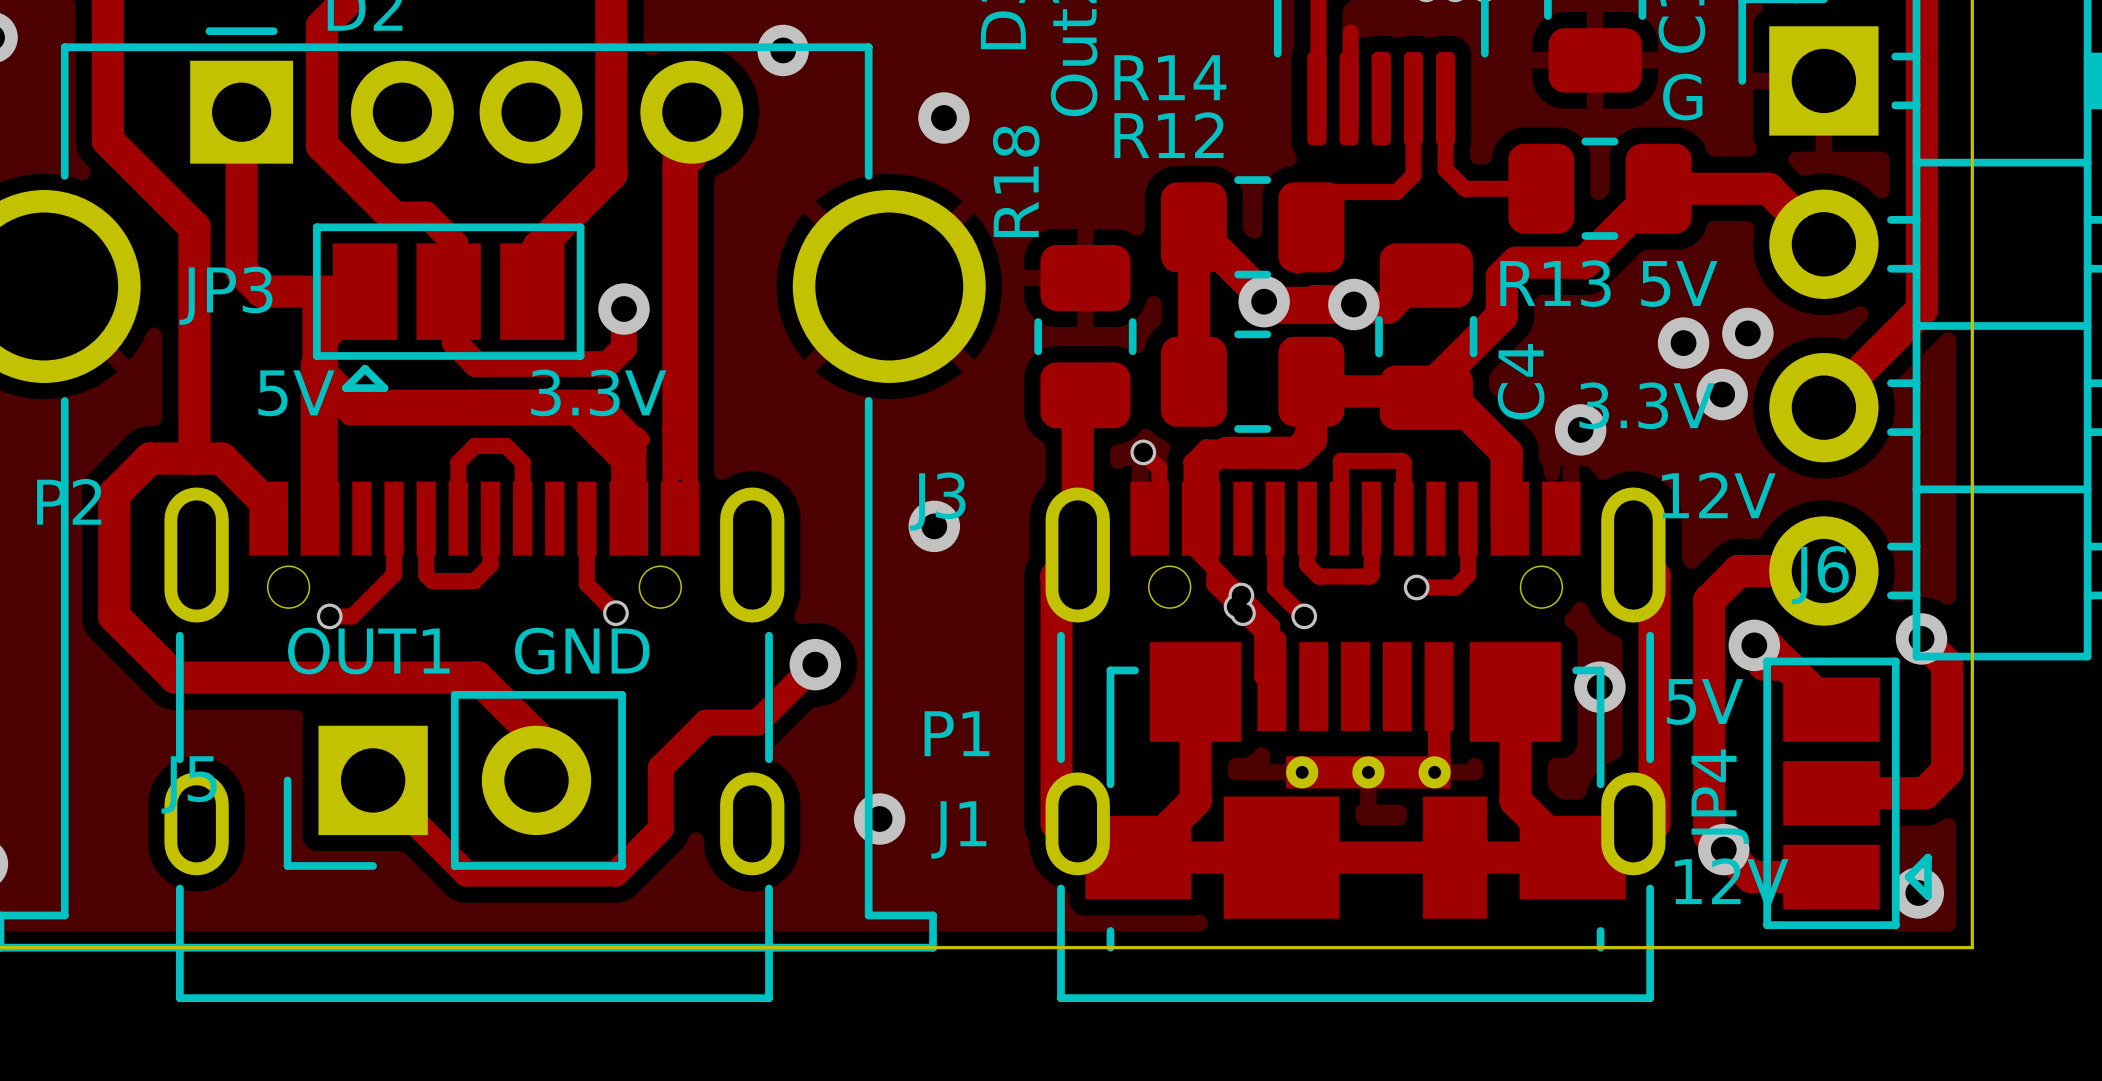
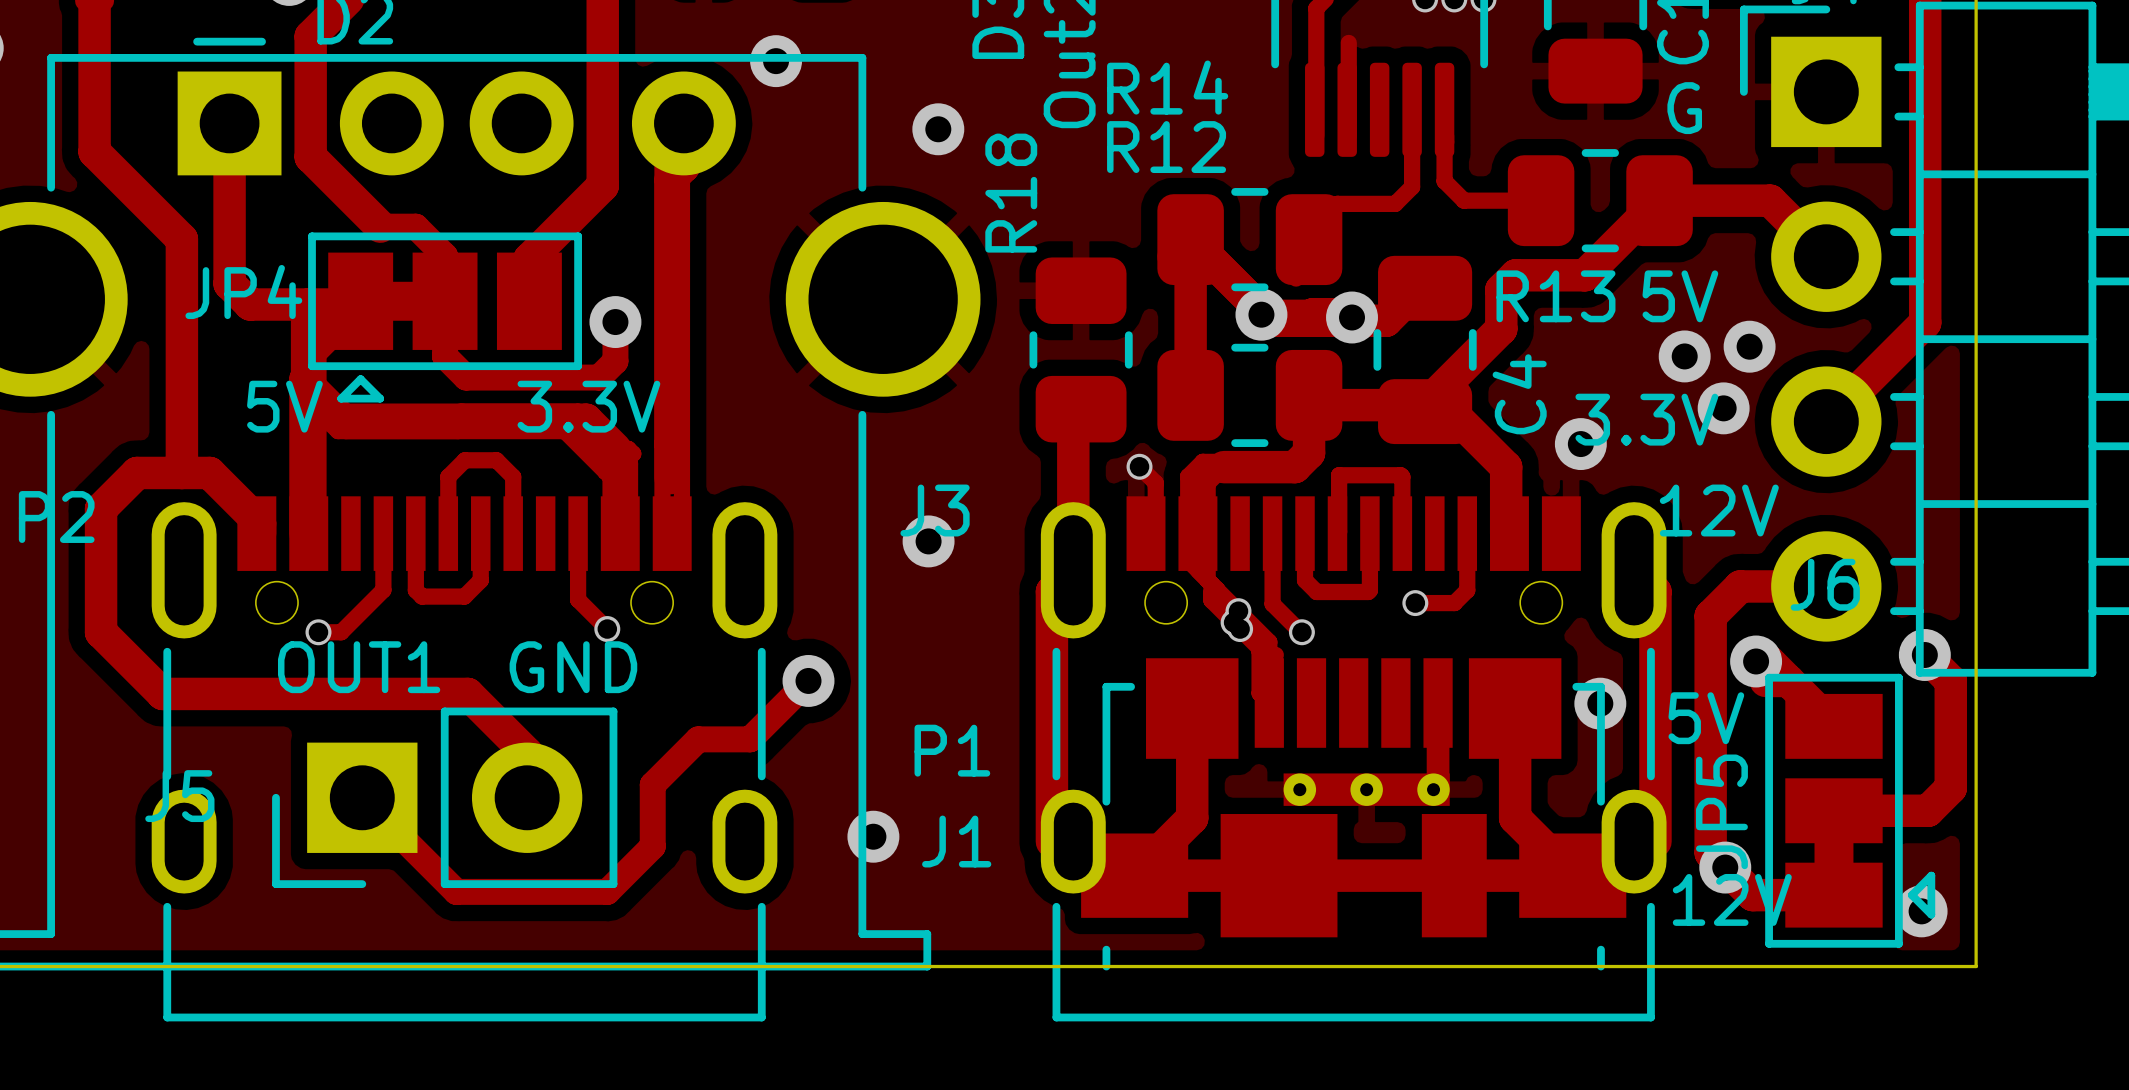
JP3: (448, 307) -> none
JP4 footprint: [1763, 657, 1932, 929] -> [308, 232, 582, 403]
JP5: none -> (1850, 810)

